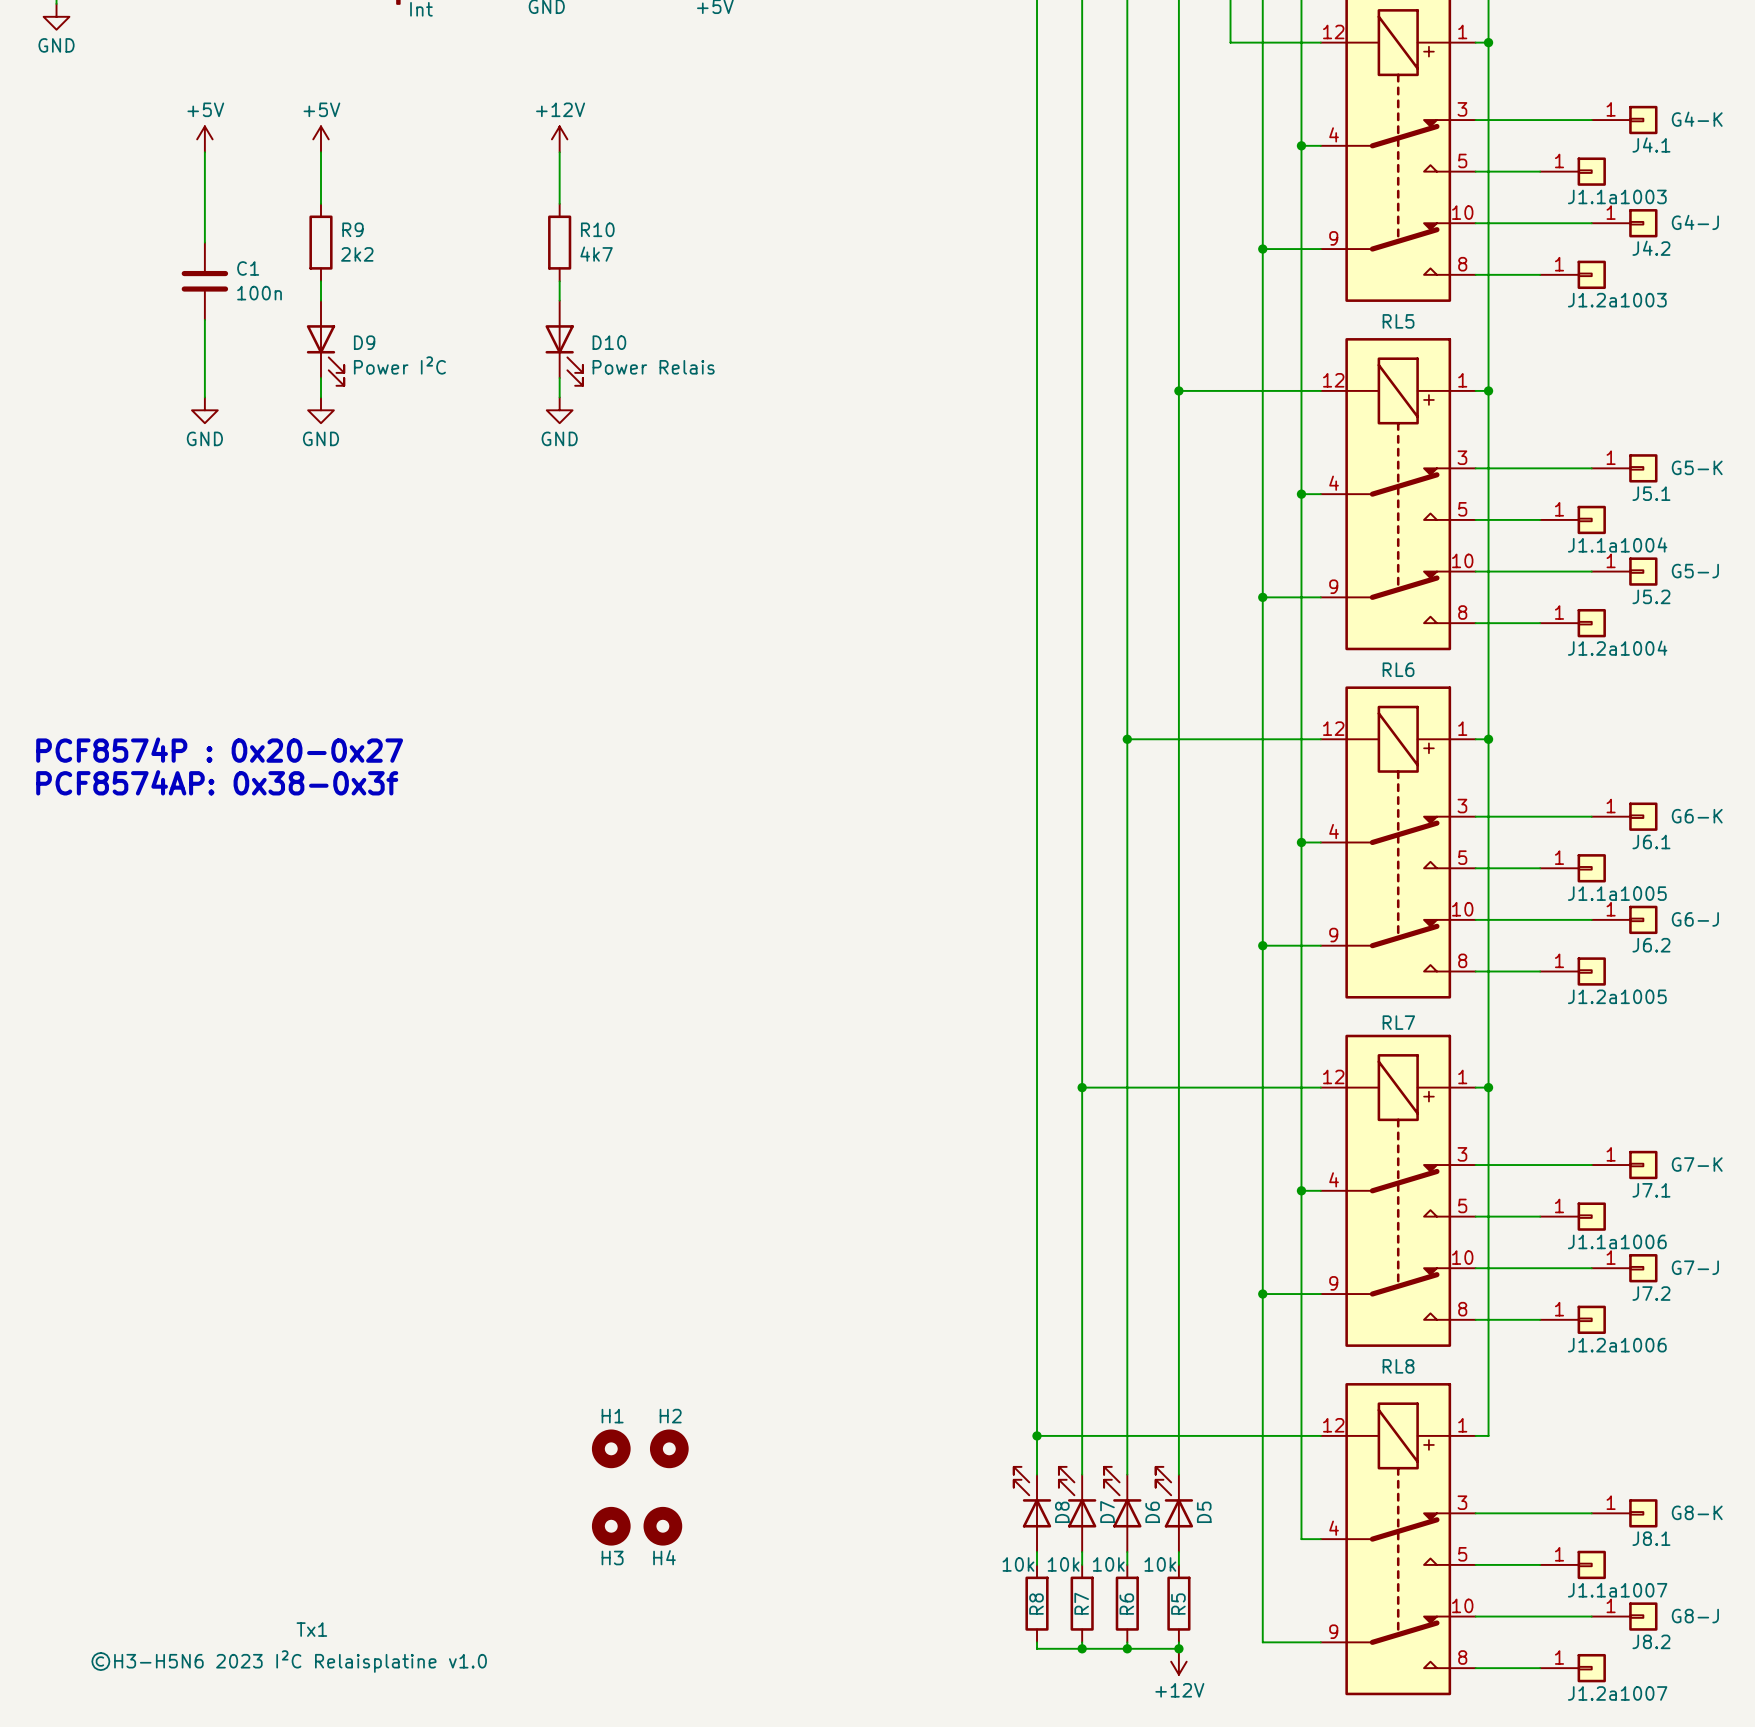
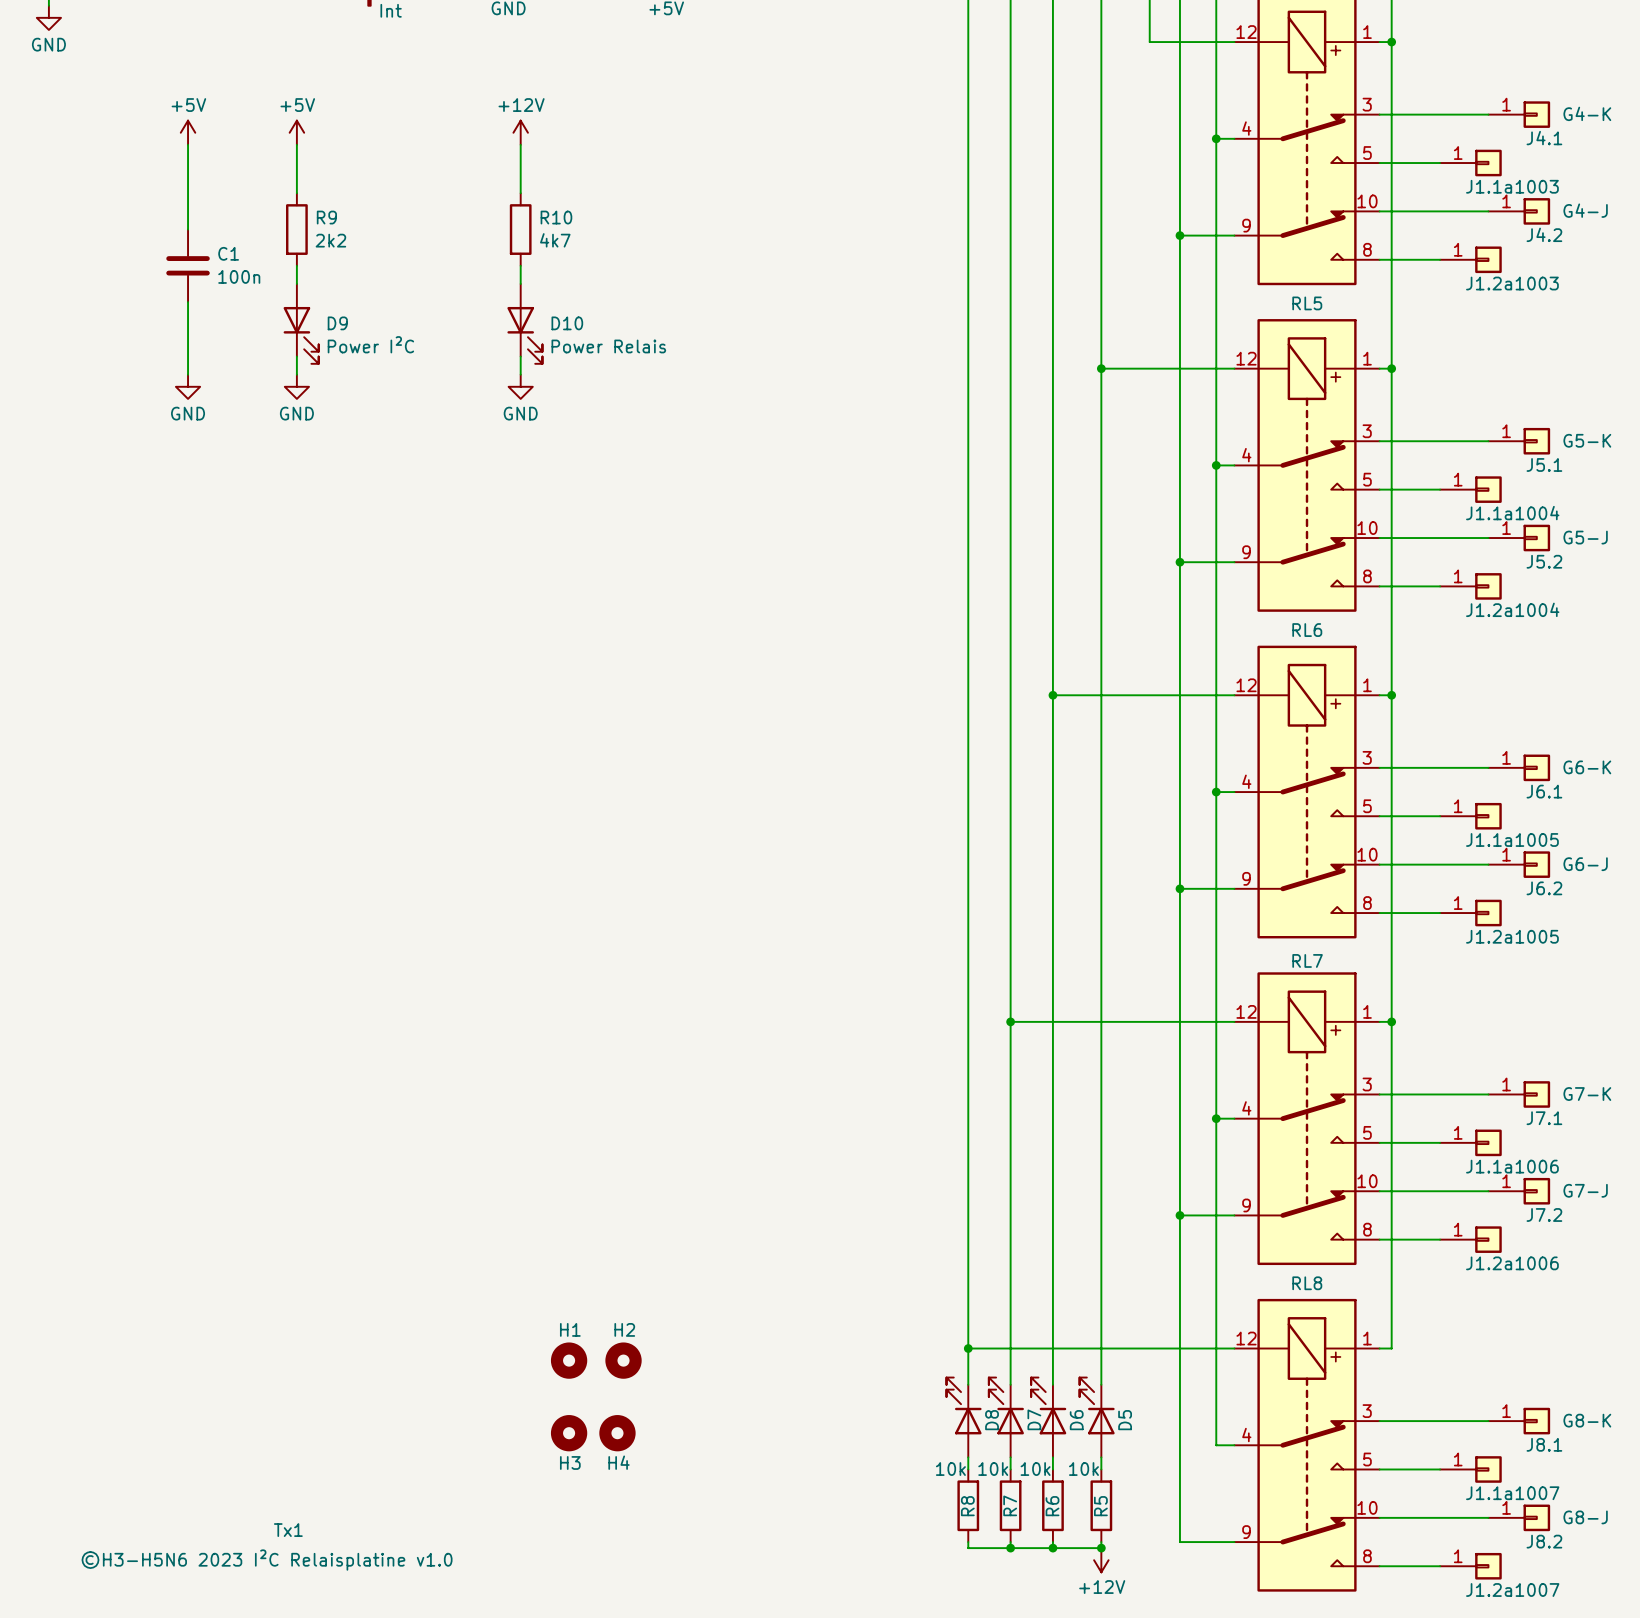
text: PCF8574P : 0x20-0x27 (219, 750) -> none
text: PCF8574AP: 0x38-0x3f (217, 782) -> none

